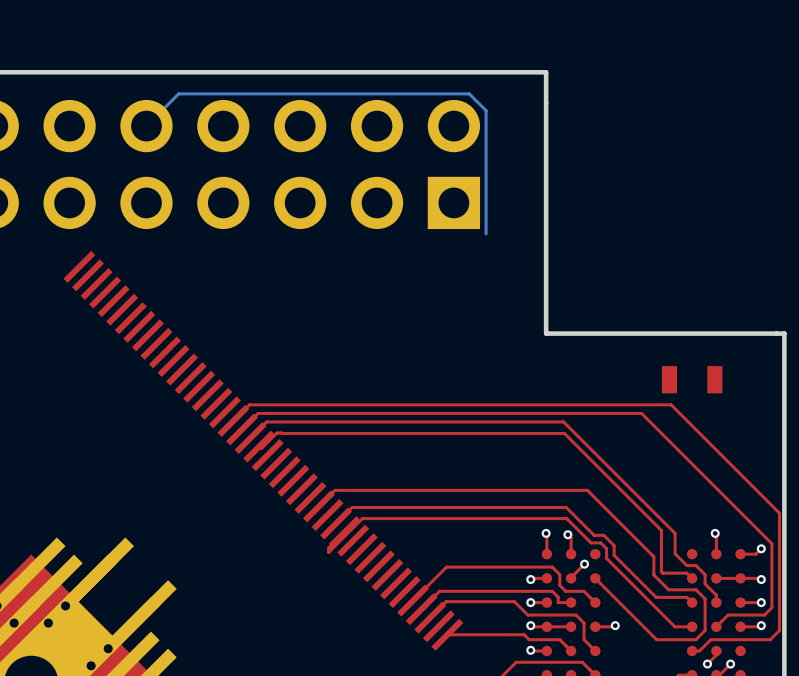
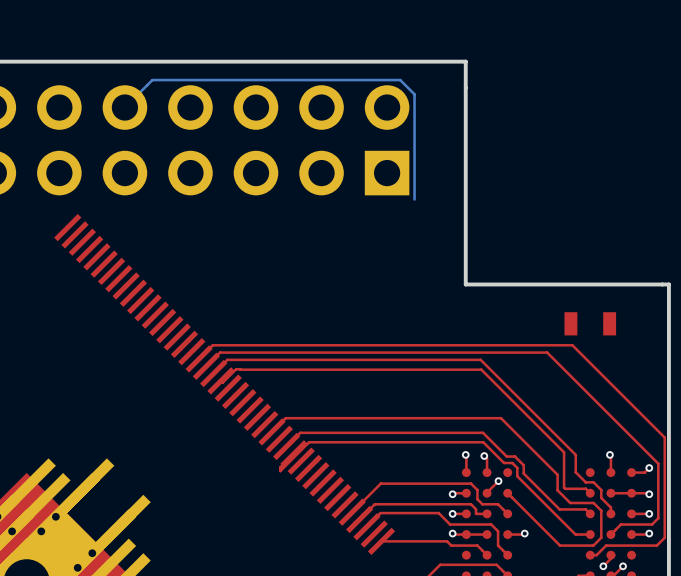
top track: (530, 650) (546, 651) -> none
via: (530, 650) -> none

